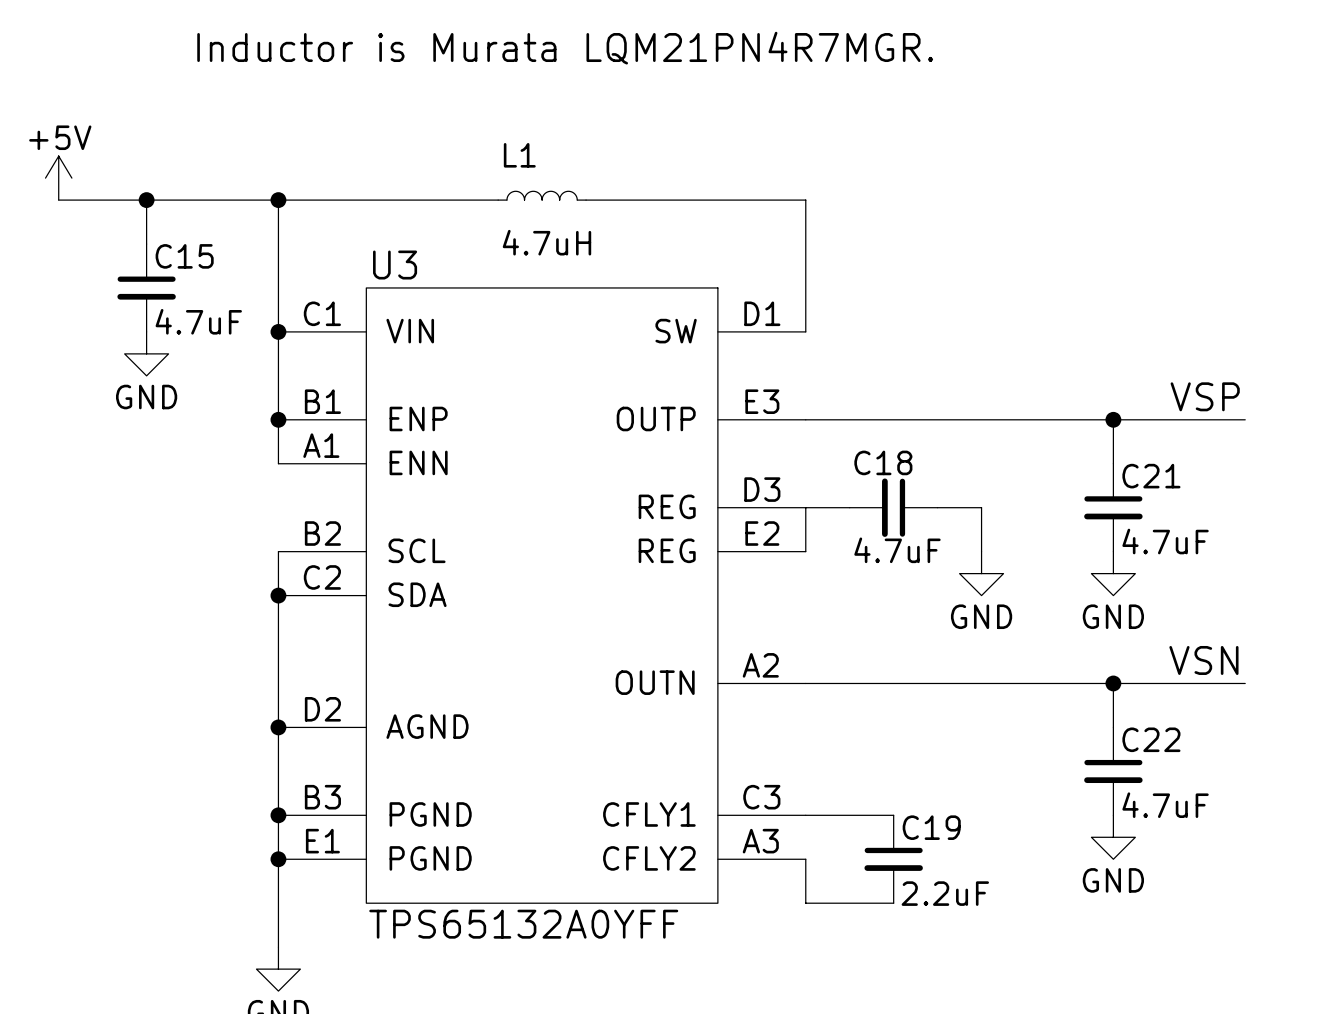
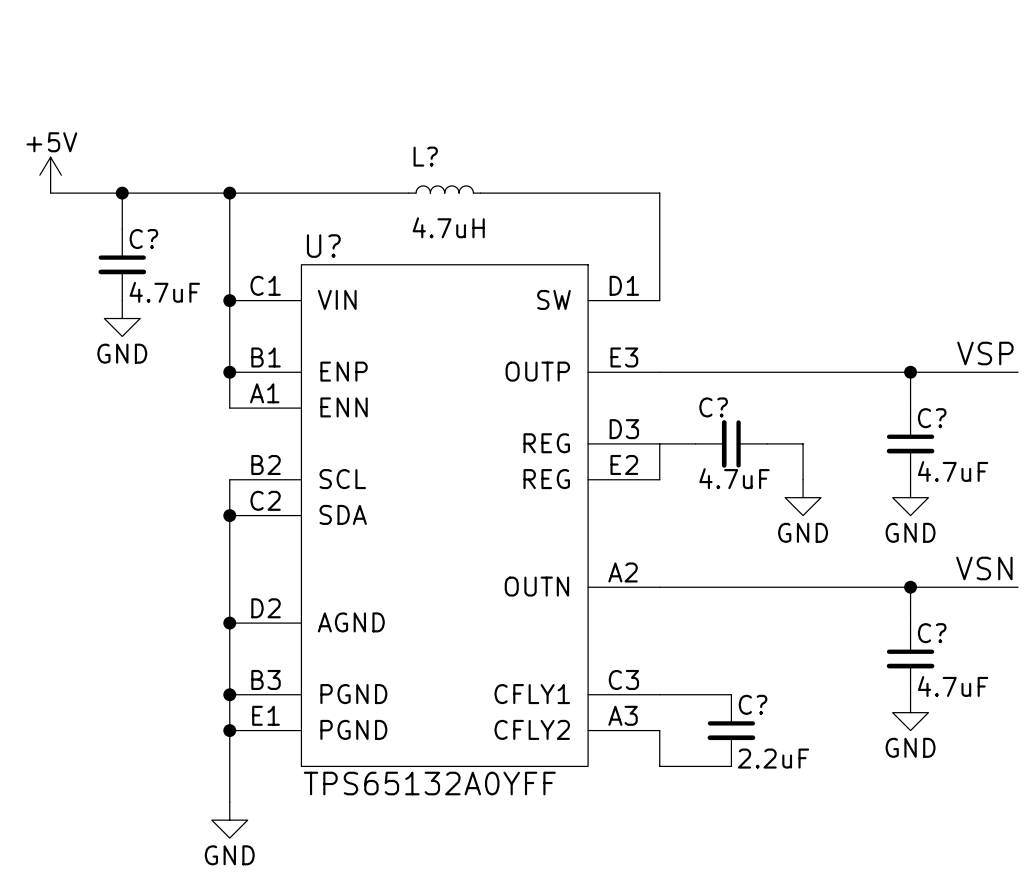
text: Inductor is Murata LQM21PN4R7MGR. (565, 48) -> none
L1 name: L1 (519, 155) -> L? (425, 156)
C15 name: C15 (184, 256) -> C? (143, 239)
U3 name: U3 (395, 265) -> U? (323, 246)
C18 name: C18 (883, 462) -> C? (713, 407)
C21 name: C21 (1151, 476) -> C? (932, 418)
C22 name: C22 (1151, 739) -> C? (932, 633)
C19 name: C19 (931, 827) -> C? (753, 704)

